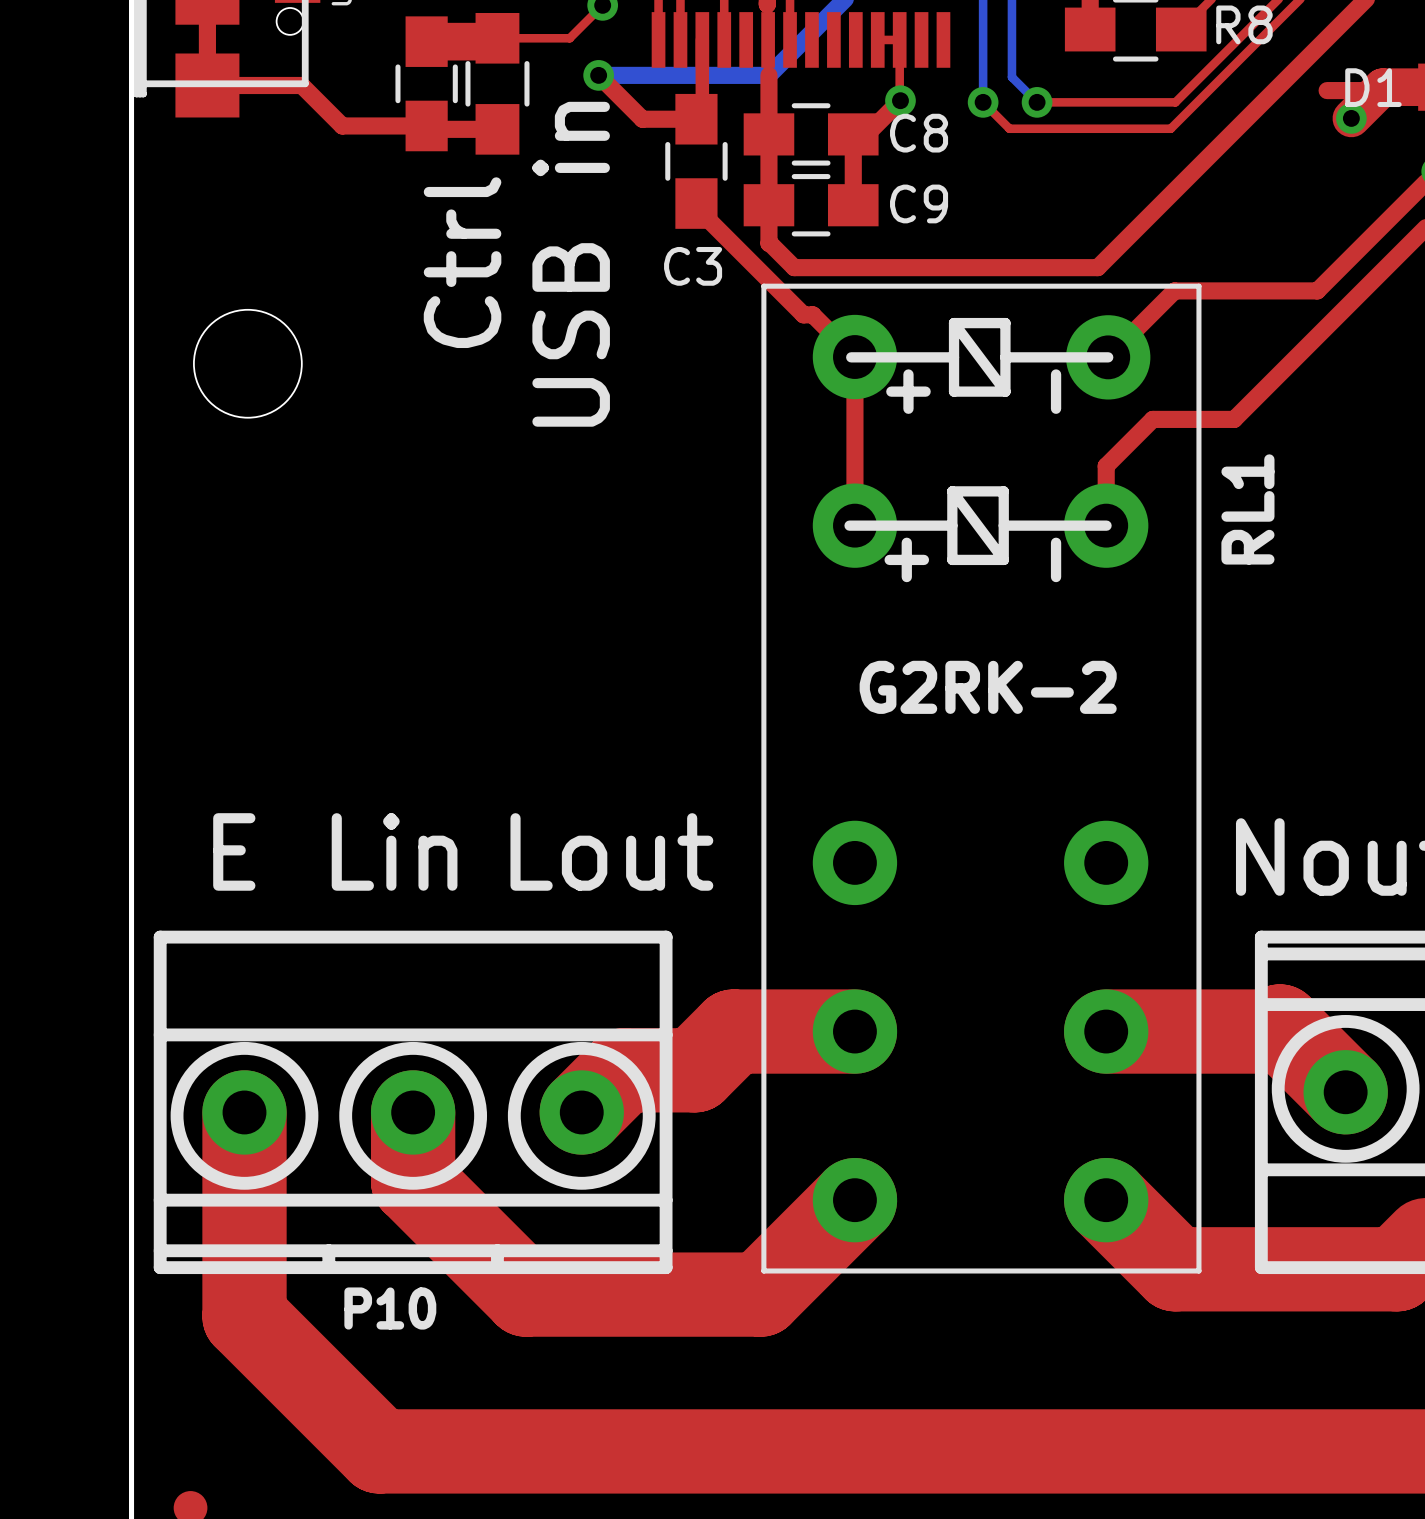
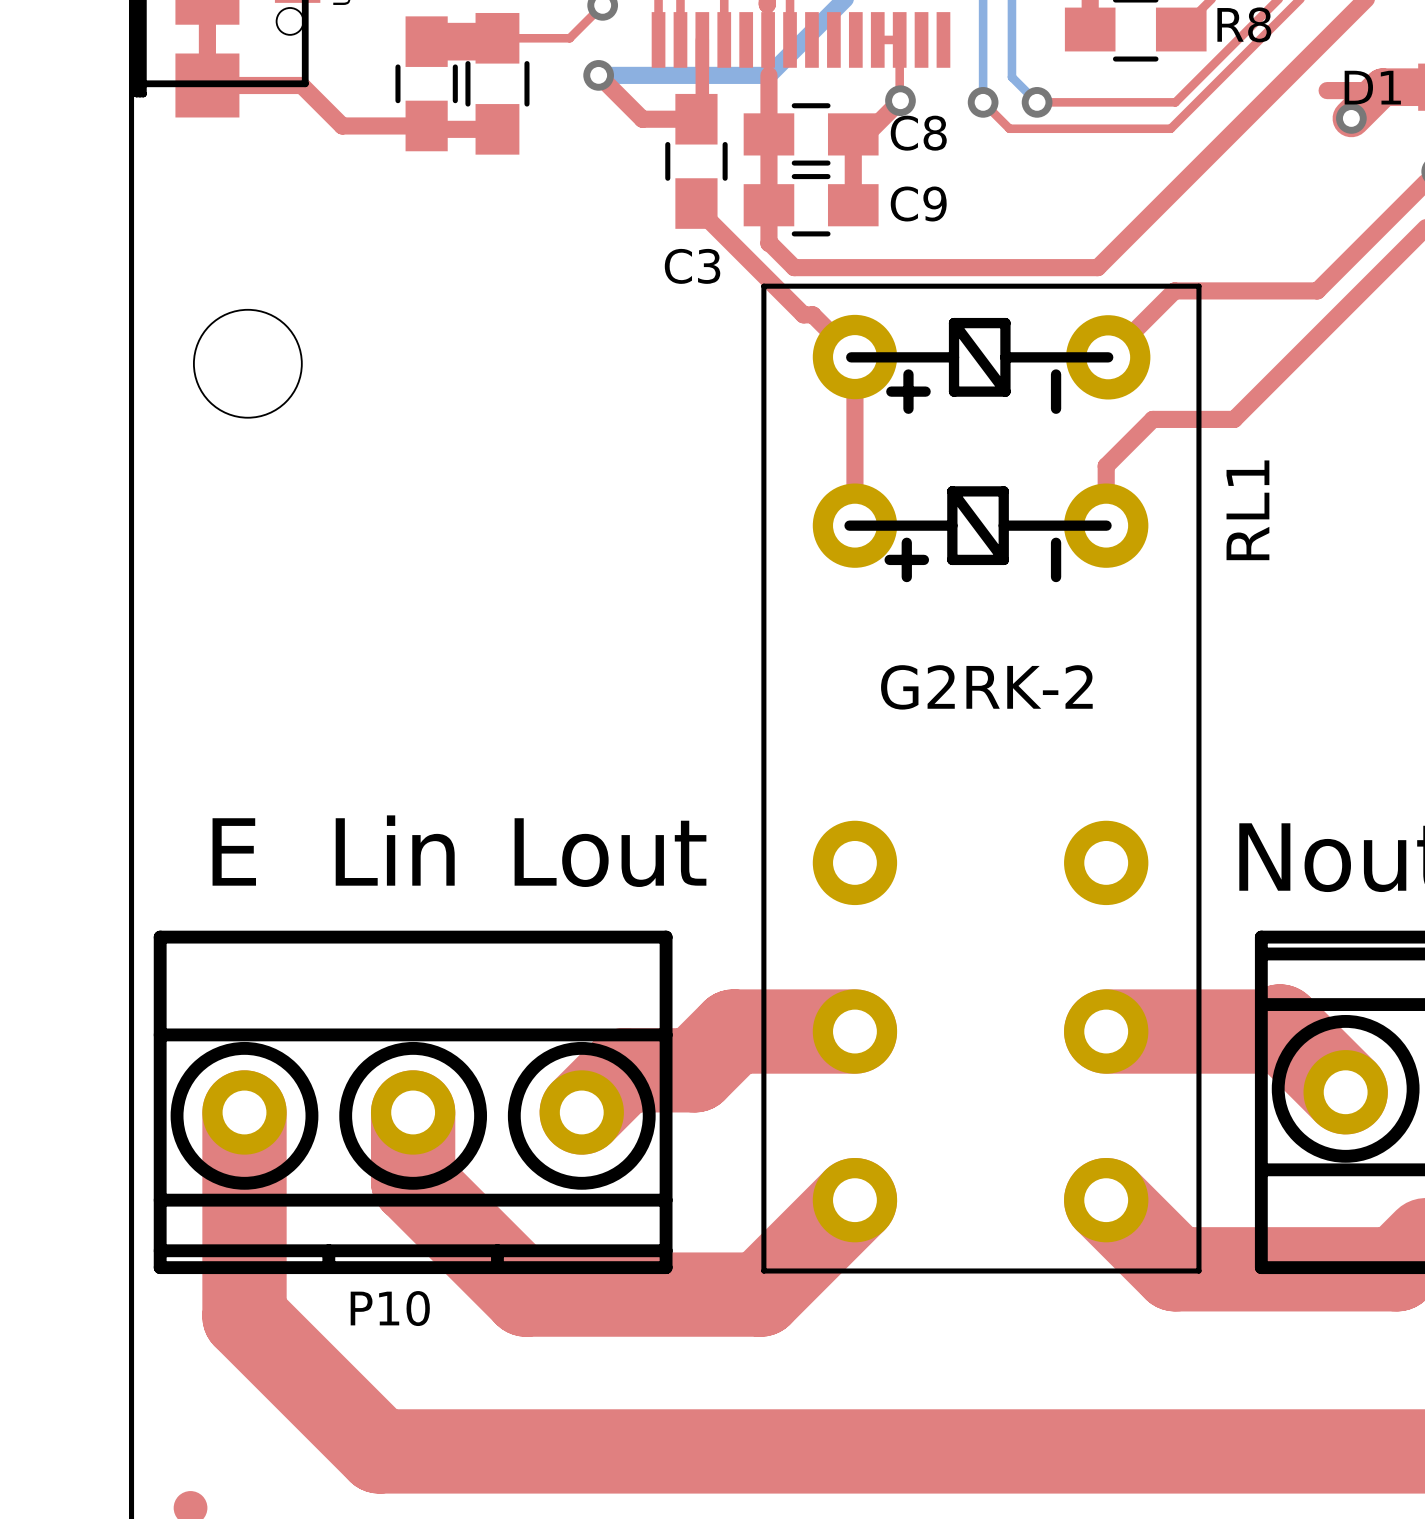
text: Ctrl (462, 262) -> none
text: USB in (571, 264) -> none

